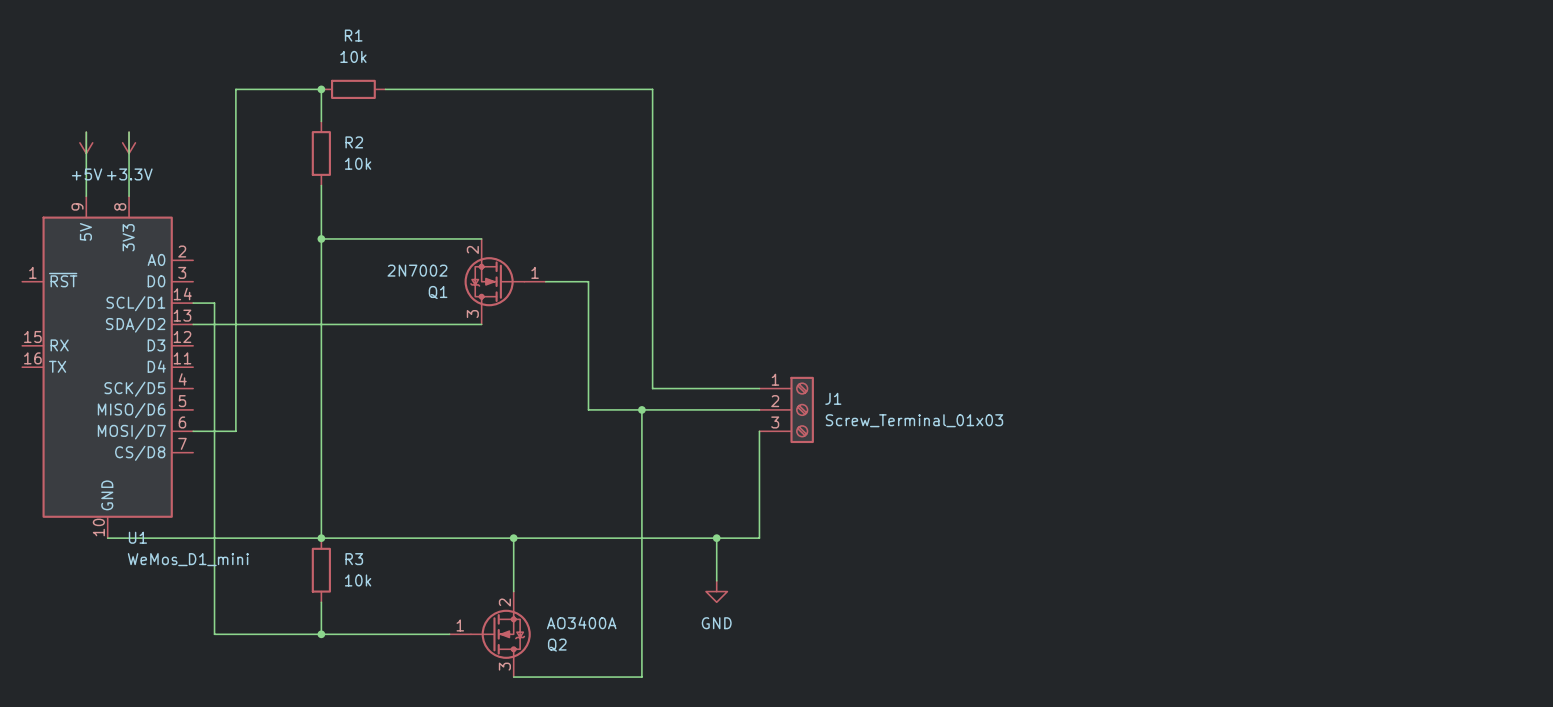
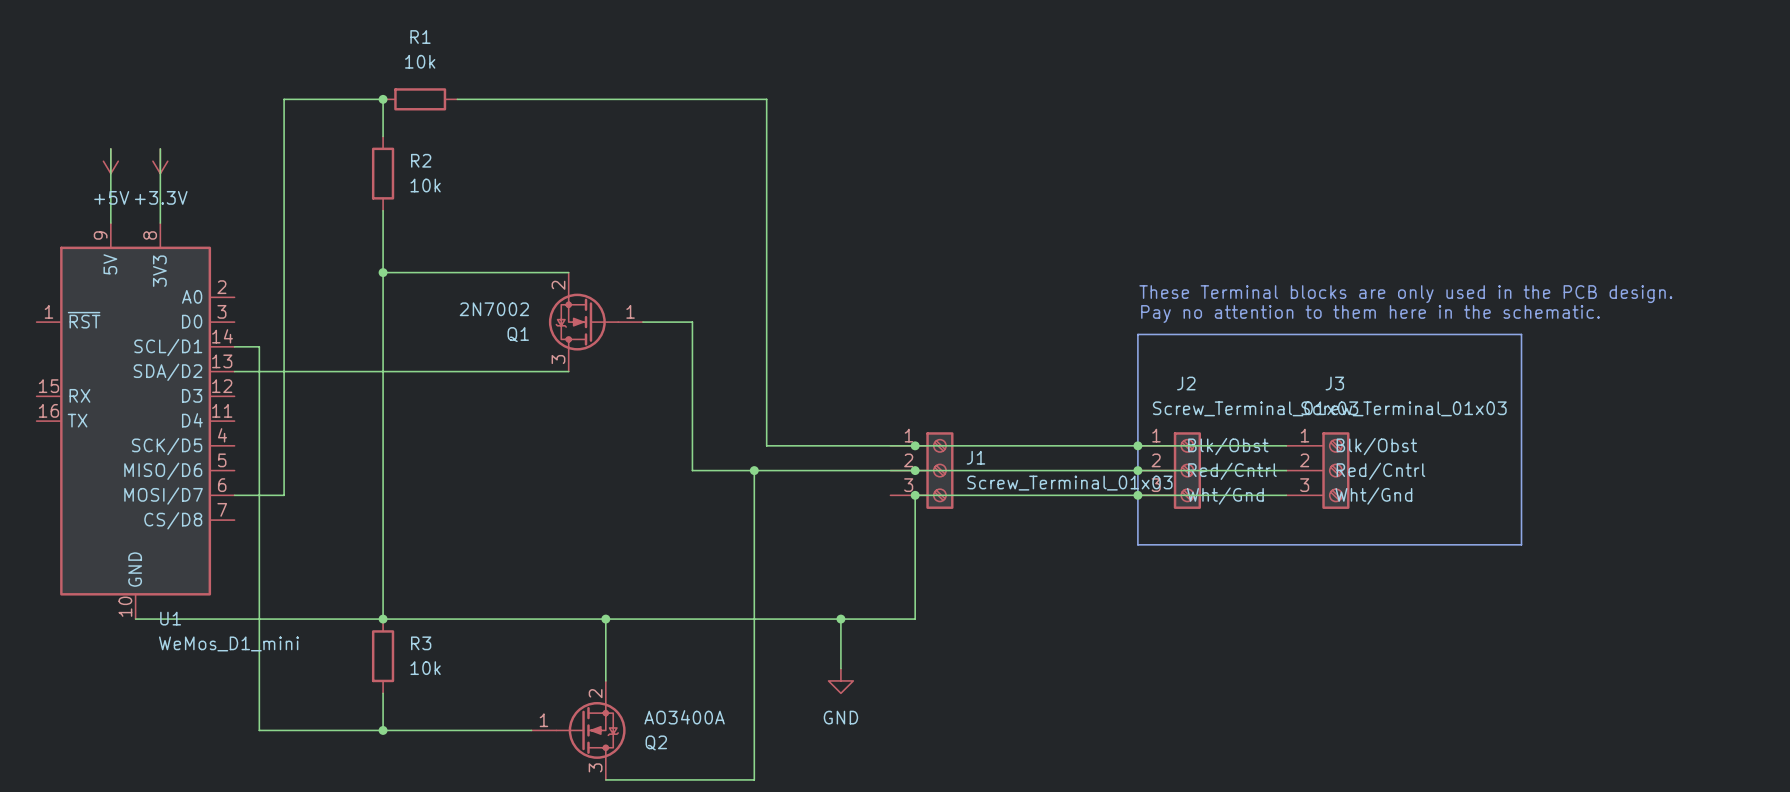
text: none -> These Terminal blocks are only used in the PCB design. (1405, 294)
text: none -> Pay no attention to them here in the schematic. (1370, 314)
line: none -> (1137, 334) (1521, 334) (1521, 544) (1137, 544) (1137, 334)
wire: none -> (890, 445) (1286, 445)
junction: none -> (915, 445)
junction: none -> (1137, 445)
wire: none -> (890, 470) (1286, 470)
junction: none -> (915, 470)
junction: none -> (1137, 470)
J2: none -> Screw_Terminal_01x03 (1169, 470)
J3: none -> Screw_Terminal_01x03 (1317, 470)
wire: (759, 431) (759, 538) -> (1286, 495) (915, 495) (915, 619) (890, 619)
junction: none -> (915, 495)
junction: none -> (1137, 495)

